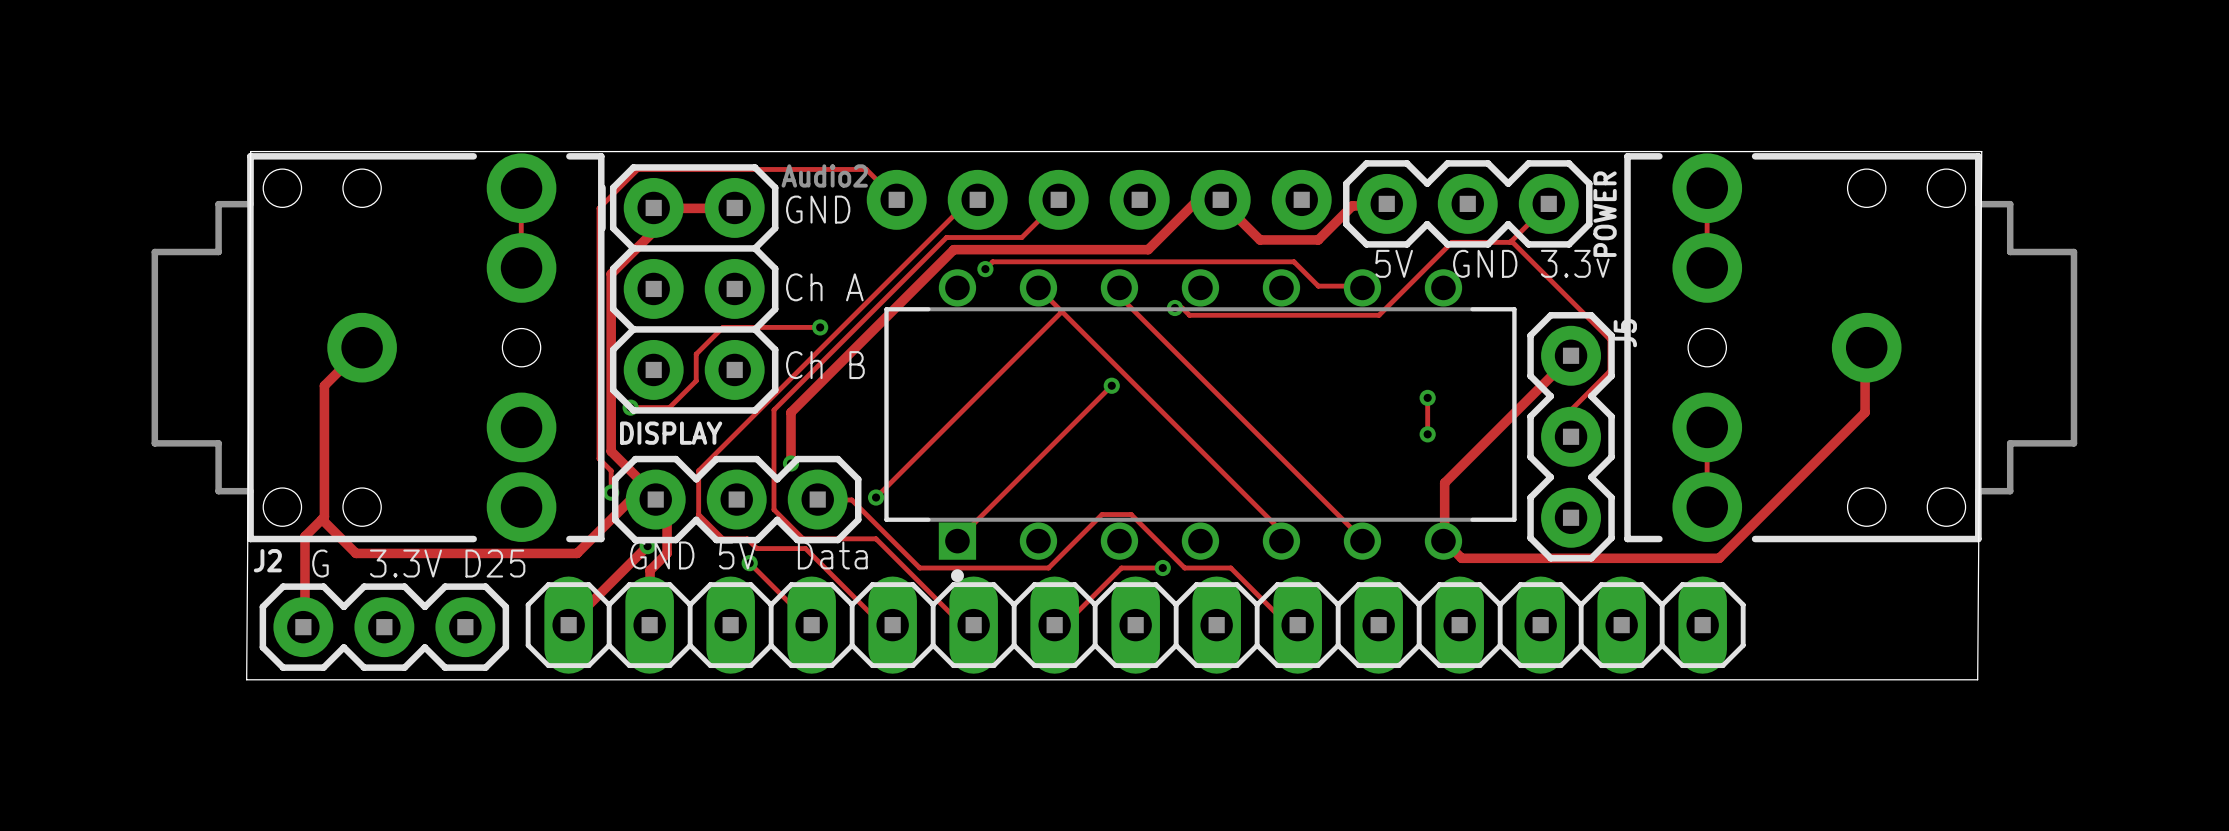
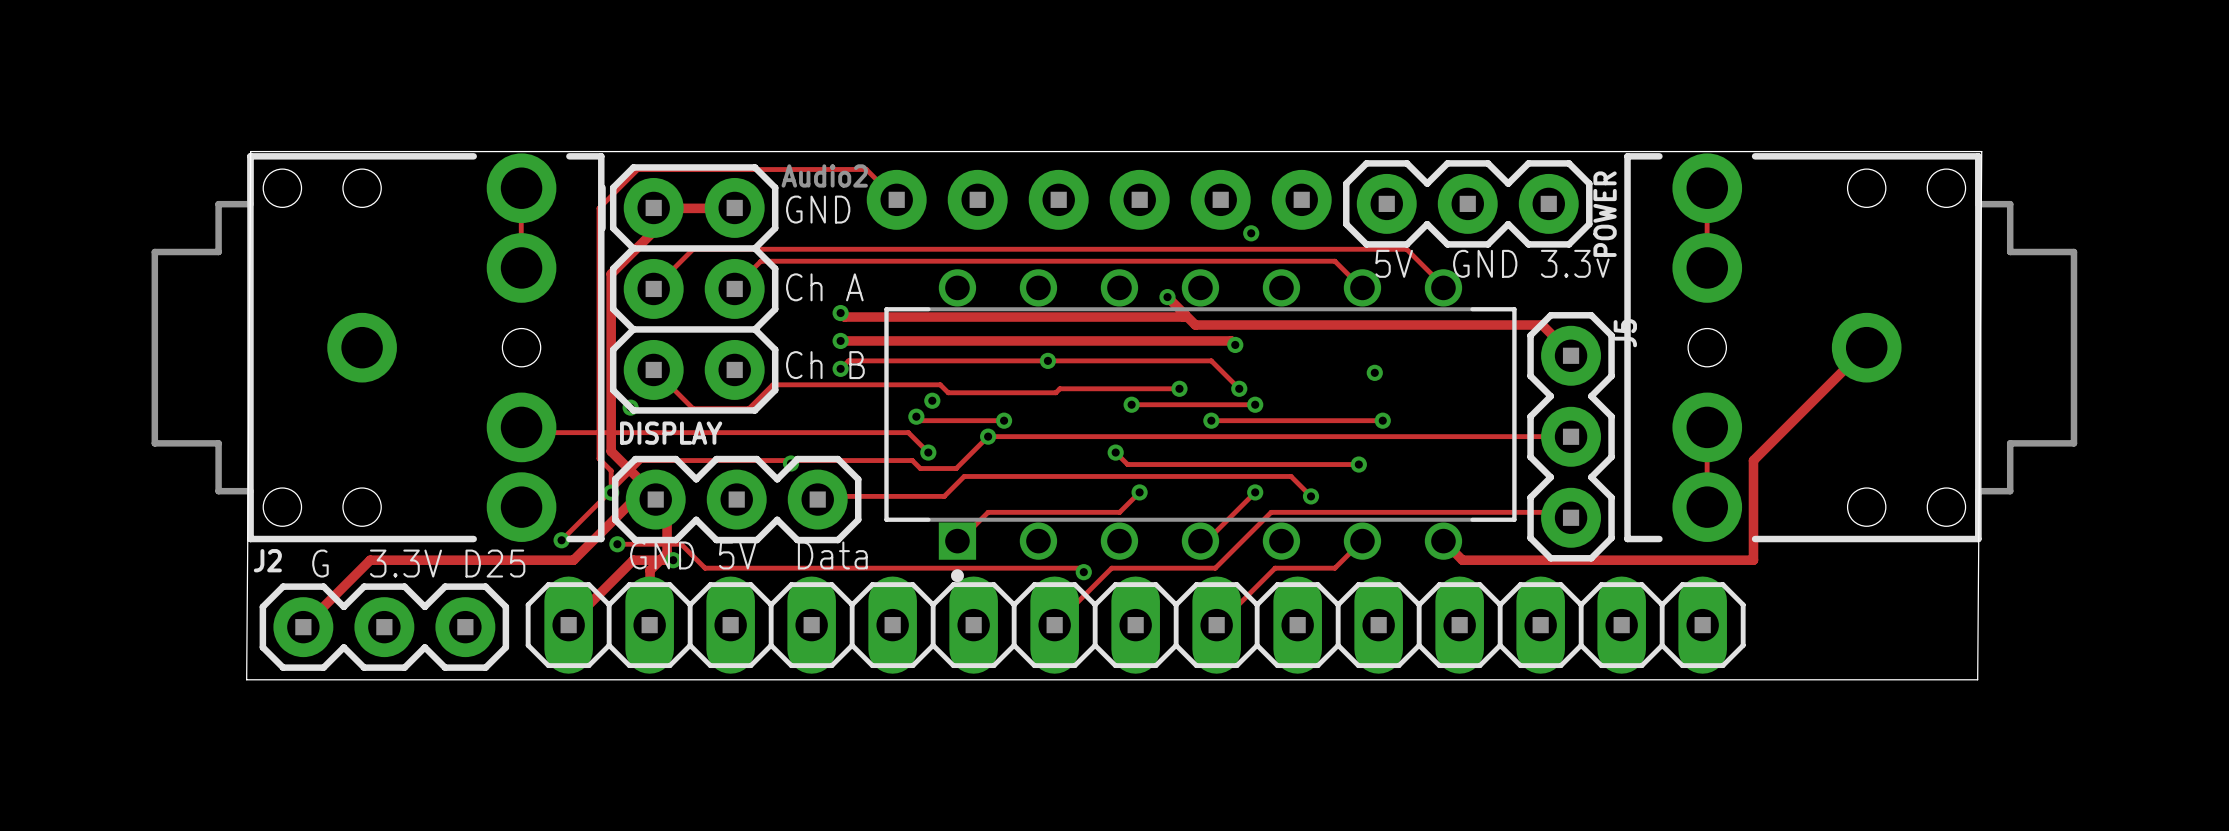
track: (977, 199) (968, 201) (698, 470) (698, 514) (722, 538) (747, 538) (756, 548) (805, 548) (880, 623) (892, 625) -> none
track: (1058, 199) (1021, 237) (946, 237) (773, 410) (773, 509) (803, 538) (876, 538) (961, 623) (973, 625) -> none
track: (1386, 203) (1386, 205) (1352, 205) (1318, 239) (1260, 239) (1220, 199) (1196, 201) (1148, 249) (953, 249) (791, 412) (791, 463) -> none
track: (1548, 203) (1510, 242) (1451, 242) (1379, 315) (1189, 315) (1182, 307) (1174, 307) -> none
via: none -> (1251, 233)
track: (1511, 241) (1609, 339) (1609, 371) (1571, 410) (1571, 436) -> (561, 540) (641, 460) (912, 460) (920, 468) (956, 468) (988, 436) (1571, 436)
track: (985, 269) (992, 261) (1294, 261) (1318, 286) (1362, 286) (1362, 287) -> (734, 288) (760, 261) (1334, 261) (1362, 287)
via: (985, 269) -> none
track: (1038, 287) (1279, 529) (1279, 538) (1281, 541) -> none
track: (1119, 287) (1121, 288) (1121, 298) (1362, 541) -> (1216, 625) (1275, 568) (1334, 568) (1362, 541)
track: none -> (1443, 287) (1406, 249) (693, 249) (653, 288)
track: none -> (1167, 297) (1195, 325) (1542, 325) (1571, 355)
via position: (1174, 307) -> (1167, 297)
track: (1061, 311) (876, 497) -> none
track: none -> (840, 313) (844, 317) (1183, 317) (1185, 315)
via: none -> (840, 313)
track: (820, 327) (722, 327) (696, 354) (696, 380) (669, 407) (630, 407) -> none
via: (820, 327) -> none
track: none -> (840, 340) (1231, 340) (1235, 344)
via: none -> (840, 340)
via: none -> (1235, 344)
track: (362, 347) (324, 385) (324, 516) (304, 536) (304, 626) (303, 627) -> none
track: (1866, 347) (1865, 349) (1865, 412) (1719, 558) (1461, 558) (1443, 541) (1444, 482) (1571, 355) -> (1866, 347) (1753, 460) (1753, 560) (1462, 560) (1443, 541)
via: none -> (1047, 360)
track: none -> (840, 368) (848, 360) (1211, 360) (1239, 388)
via: none -> (840, 368)
track: none -> (653, 369) (693, 408) (748, 408) (772, 384) (940, 384) (948, 392) (1055, 392) (1059, 388) (1179, 388)
via: none -> (1374, 372)
track: (1111, 385) (957, 541) -> (1139, 492) (1119, 512) (988, 512) (957, 541)
via position: (1111, 385) -> (1131, 404)
via: none -> (1179, 388)
via: none -> (1239, 388)
track: (1427, 397) (1427, 434) -> none
via: (1427, 397) -> none
via: none -> (932, 400)
track: none -> (1131, 404) (1255, 404)
via: none -> (1255, 404)
track: none -> (916, 416) (920, 420) (1004, 420)
via: none -> (916, 416)
via: none -> (1004, 420)
track: none -> (1211, 420) (1382, 420)
via: none -> (1211, 420)
via: none -> (1382, 420)
track: none -> (521, 427) (525, 432) (908, 432) (928, 452)
via: (1427, 434) -> none
via: none -> (988, 436)
via: none -> (928, 452)
track: none -> (1115, 452) (1127, 464) (1358, 464)
via: none -> (1115, 452)
via: none -> (1358, 464)
via: none -> (1139, 492)
track: none -> (1255, 492) (1207, 540) (1200, 541)
via: none -> (1255, 492)
via: none -> (1311, 496)
via: (876, 497) -> none
track: (655, 499) (642, 487) (577, 553) (356, 553) (322, 519) -> (655, 499) (633, 500) (573, 560) (370, 560) (303, 627)
track: (817, 499) (851, 499) (919, 568) (1048, 568) (1102, 514) (1131, 514) (1184, 568) (1230, 568) (1286, 623) (1297, 625) -> (817, 499) (820, 496) (944, 496) (964, 476) (1291, 476) (1311, 496)
via: none -> (561, 540)
track: none -> (617, 544) (681, 544) (705, 568) (1079, 568) (1083, 572)
via: none -> (617, 544)
track: (647, 546) (568, 625) -> (673, 560) (633, 560) (568, 625)
via: (647, 546) -> none
via: none -> (673, 560)
track: (749, 563) (811, 625) -> none
via: (749, 563) -> none
track: (1162, 568) (1121, 568) (1065, 623) (1054, 625) -> (1571, 517) (1566, 512) (1271, 512) (1215, 568) (1111, 568) (1054, 625)
via: (1162, 568) -> none
via: none -> (1083, 572)

